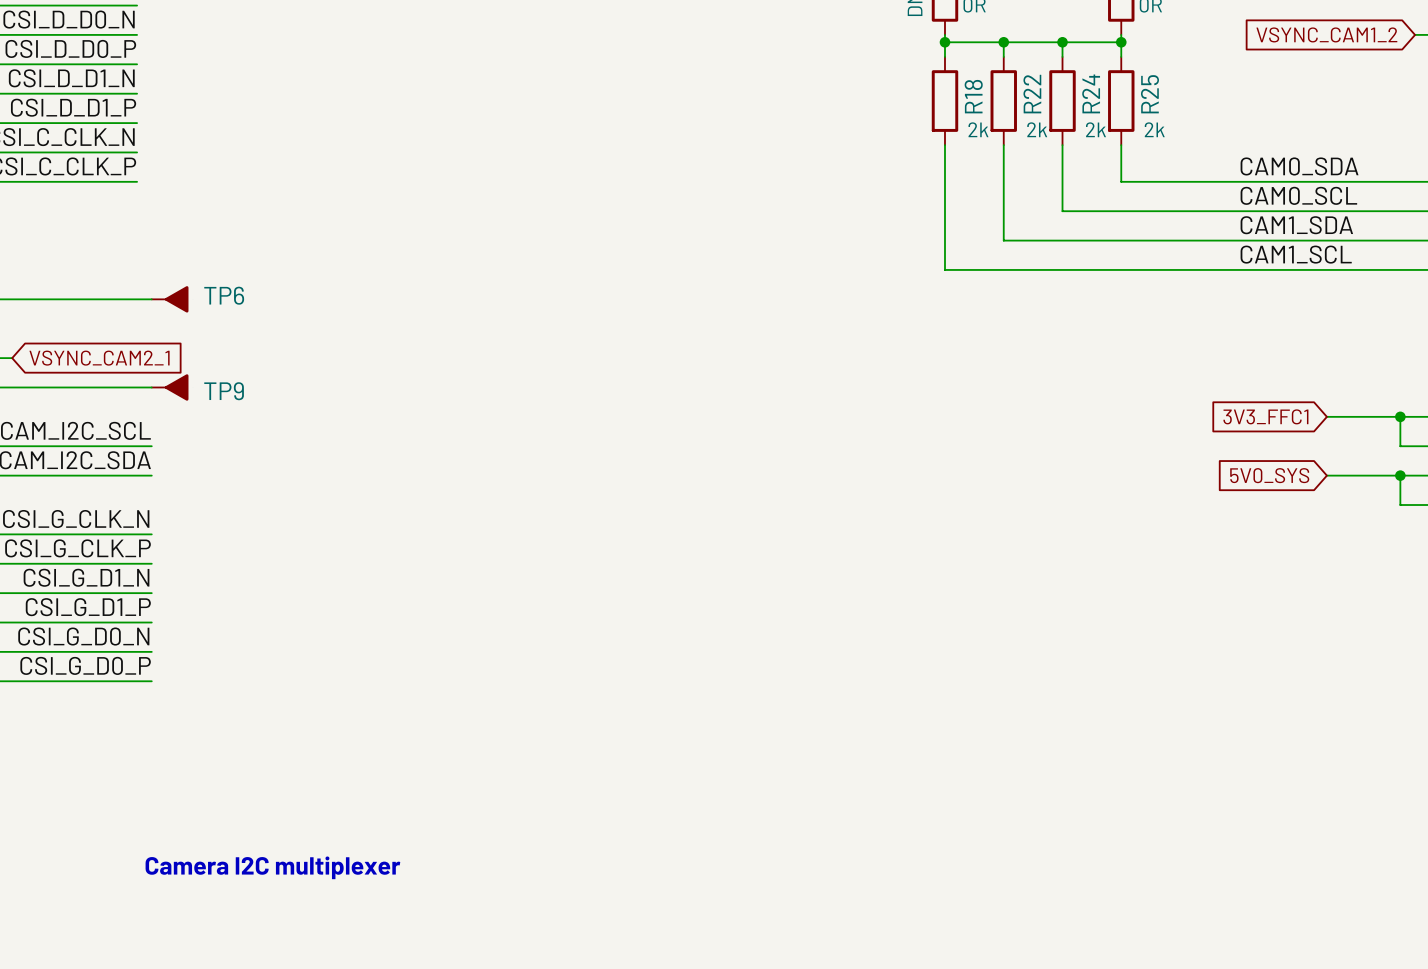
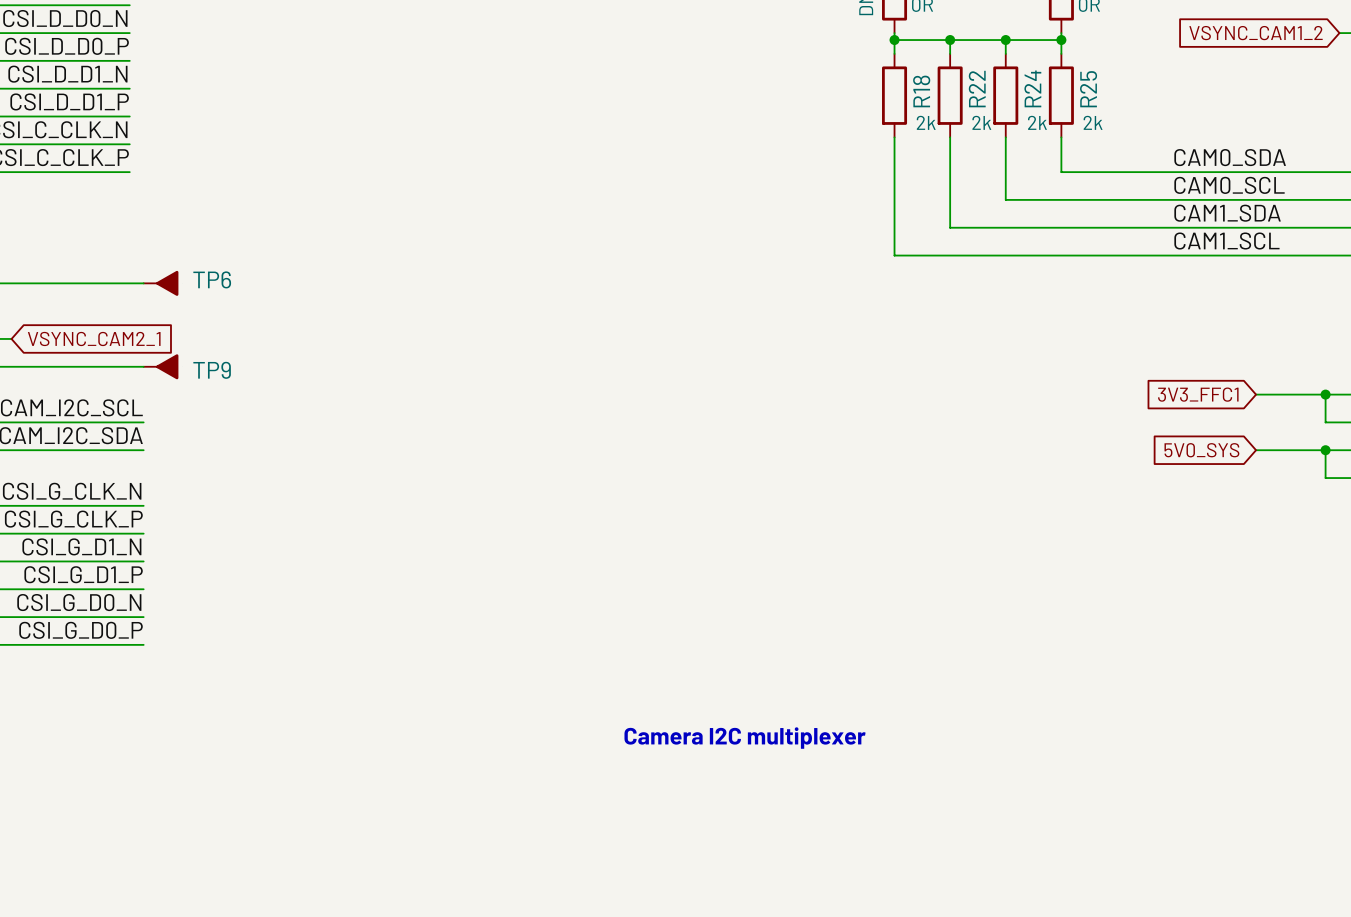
text: none -> Camera I2C multiplexer (745, 738)
text: Camera I2C multiplexer (272, 867) -> none

